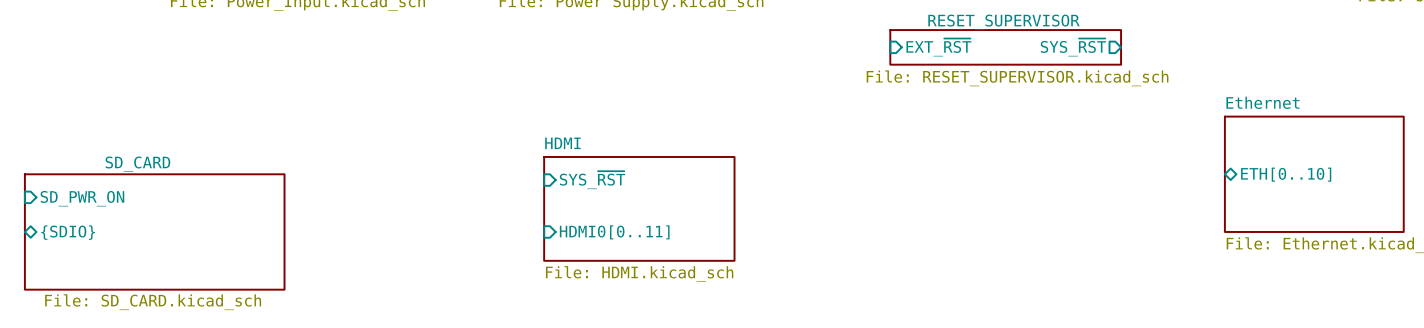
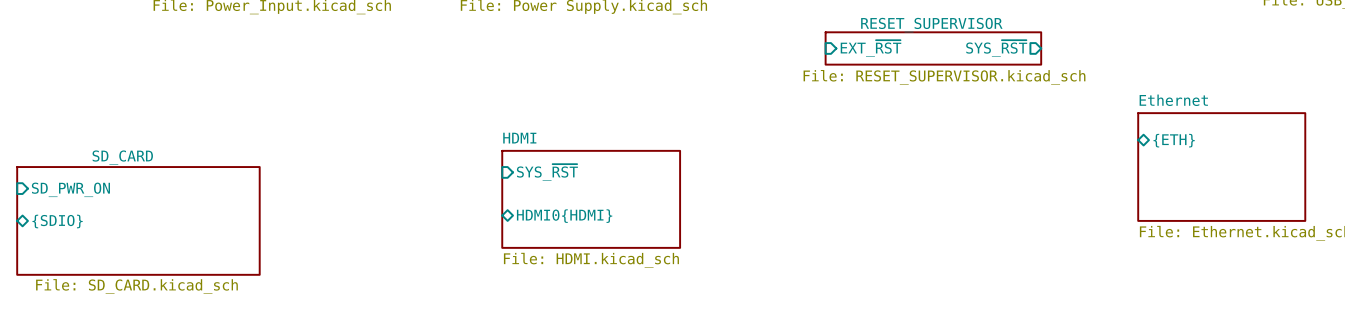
sheet pin: none -> {ETH} (1174, 140)
sheet pin: ETH[0..10] (1286, 174) -> none
sheet pin shape: input (614, 232) -> bidirectional (564, 216)
sheet pin: HDMI0[0..11] (614, 232) -> HDMI0{HDMI} (564, 216)

